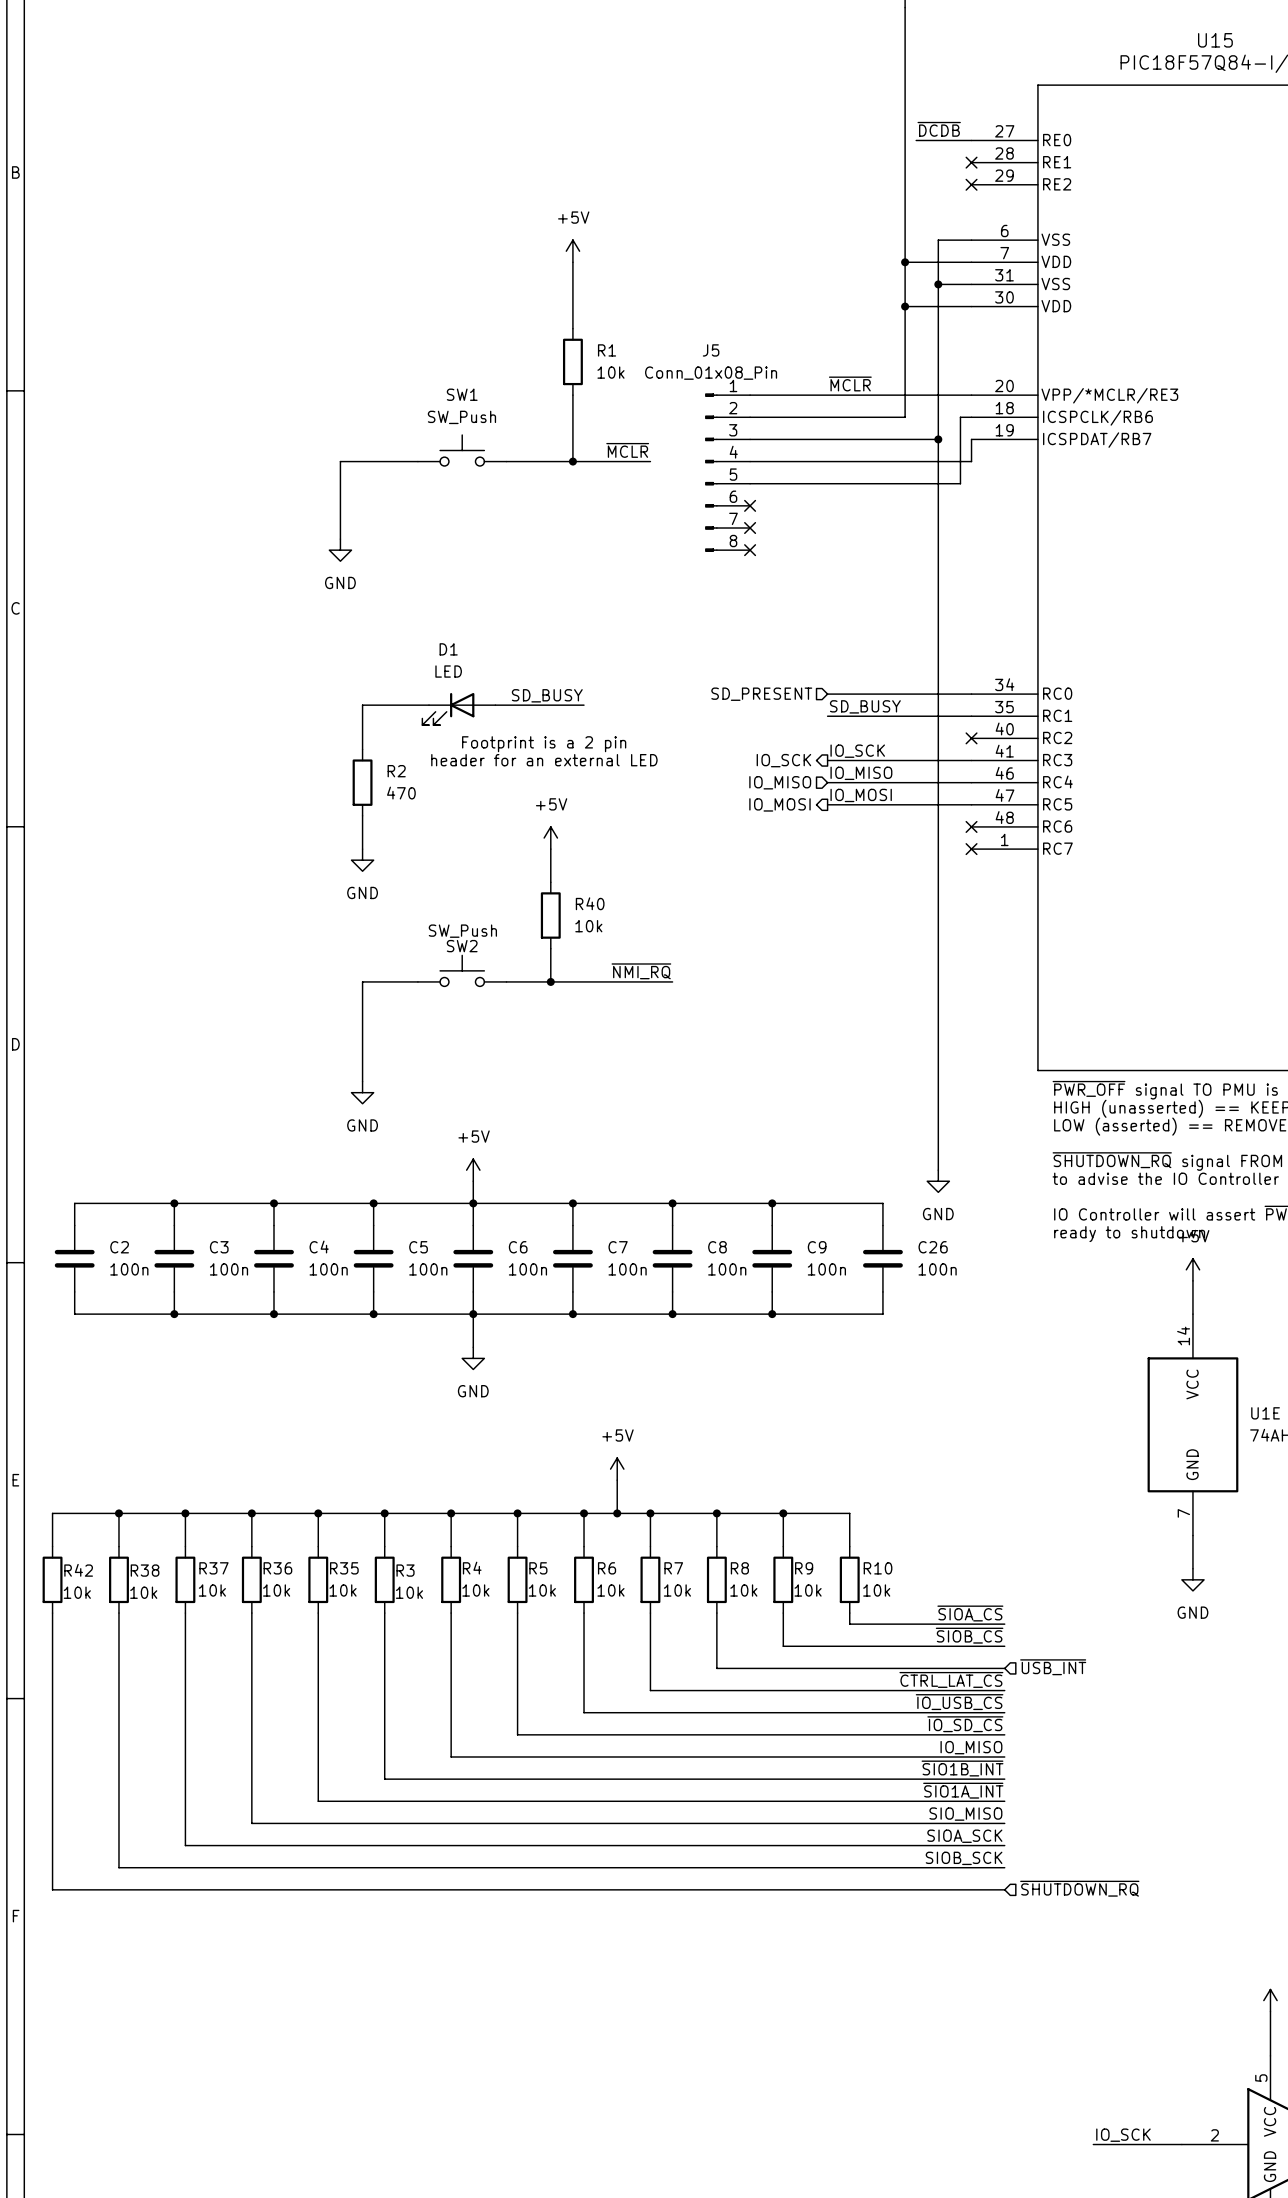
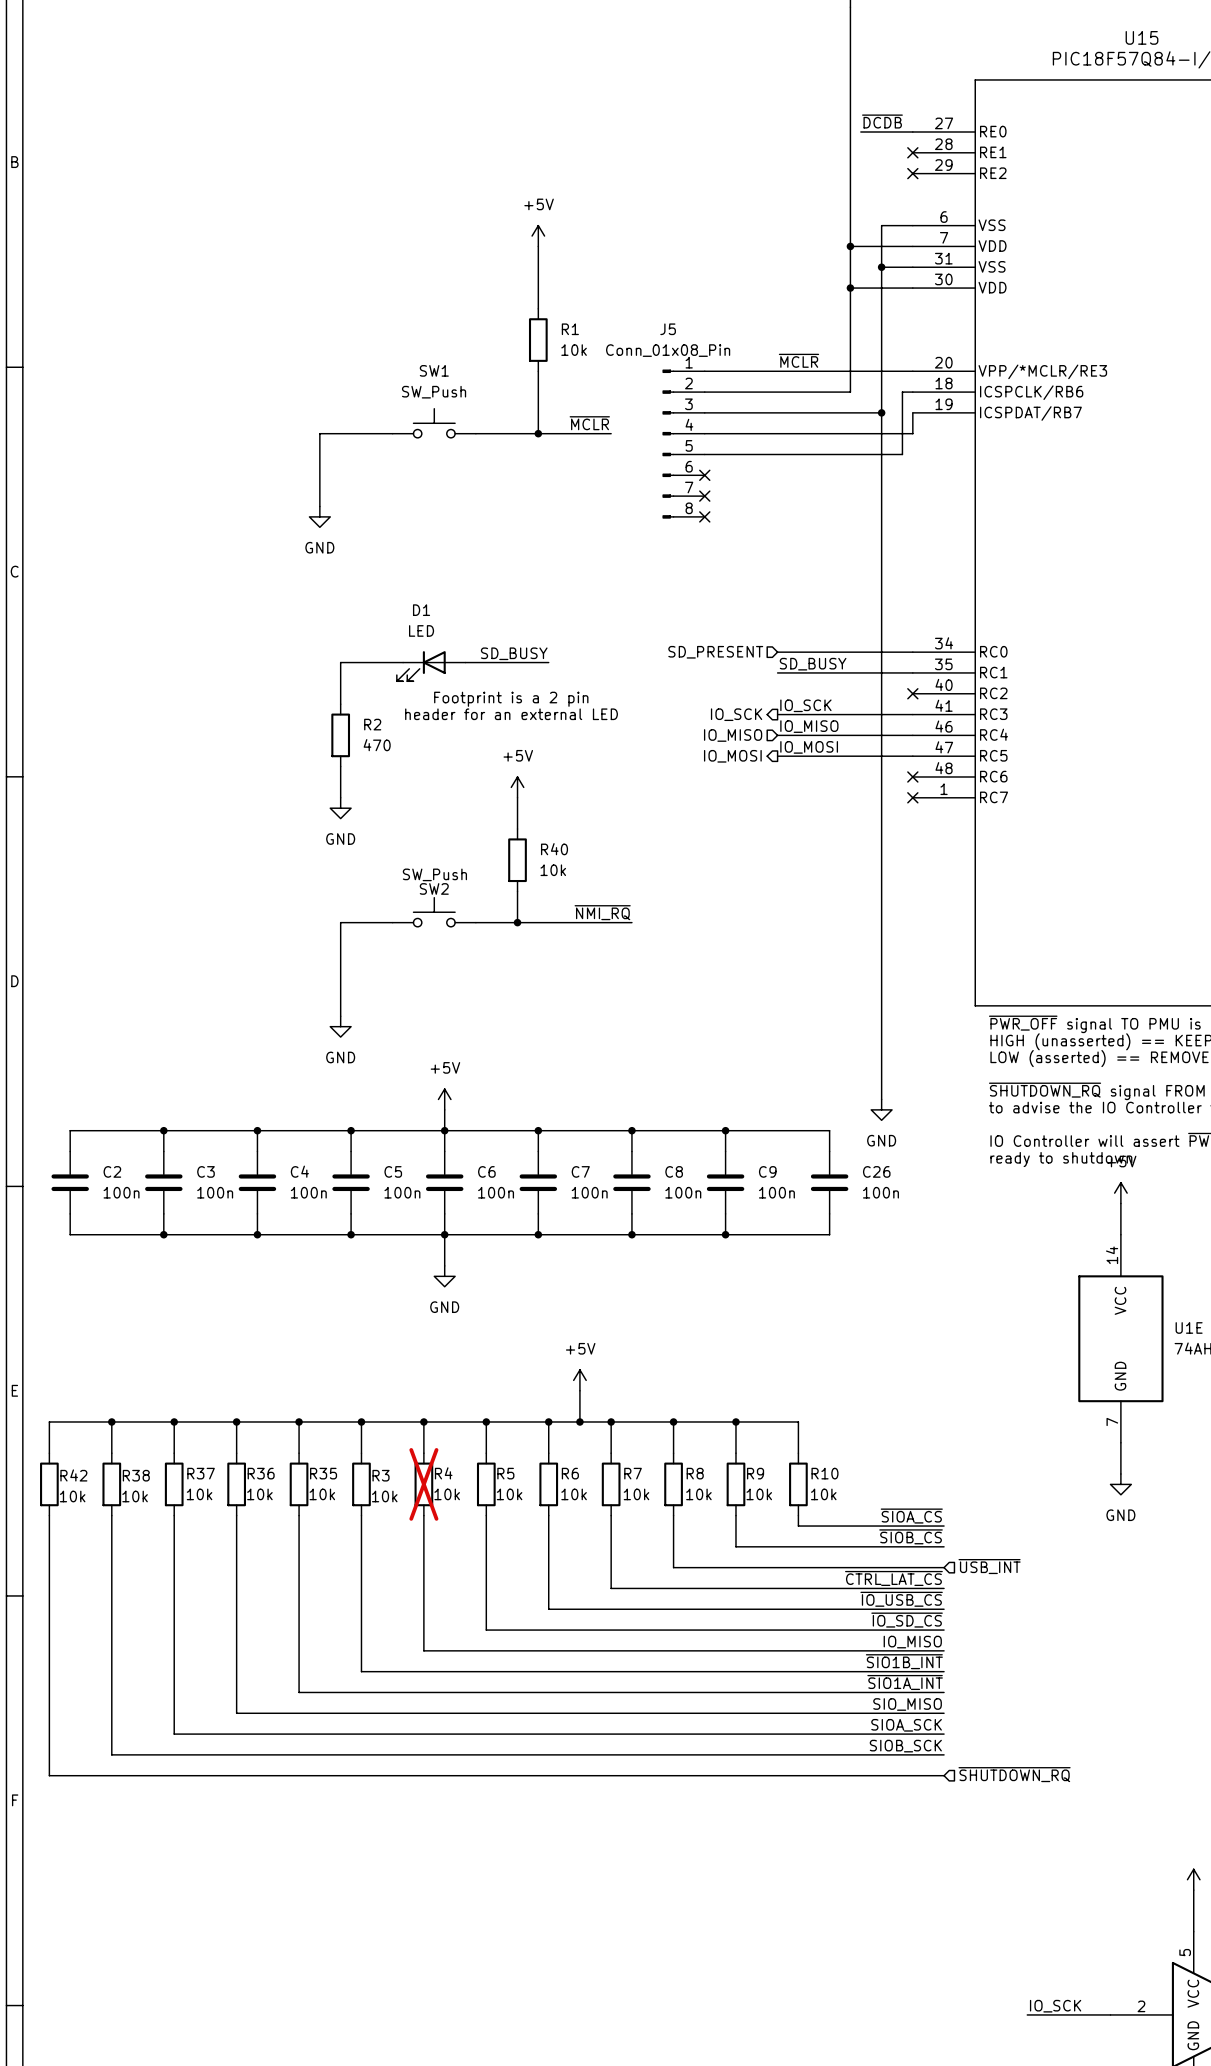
R4 do-not-place cross: none -> (423, 1484)

